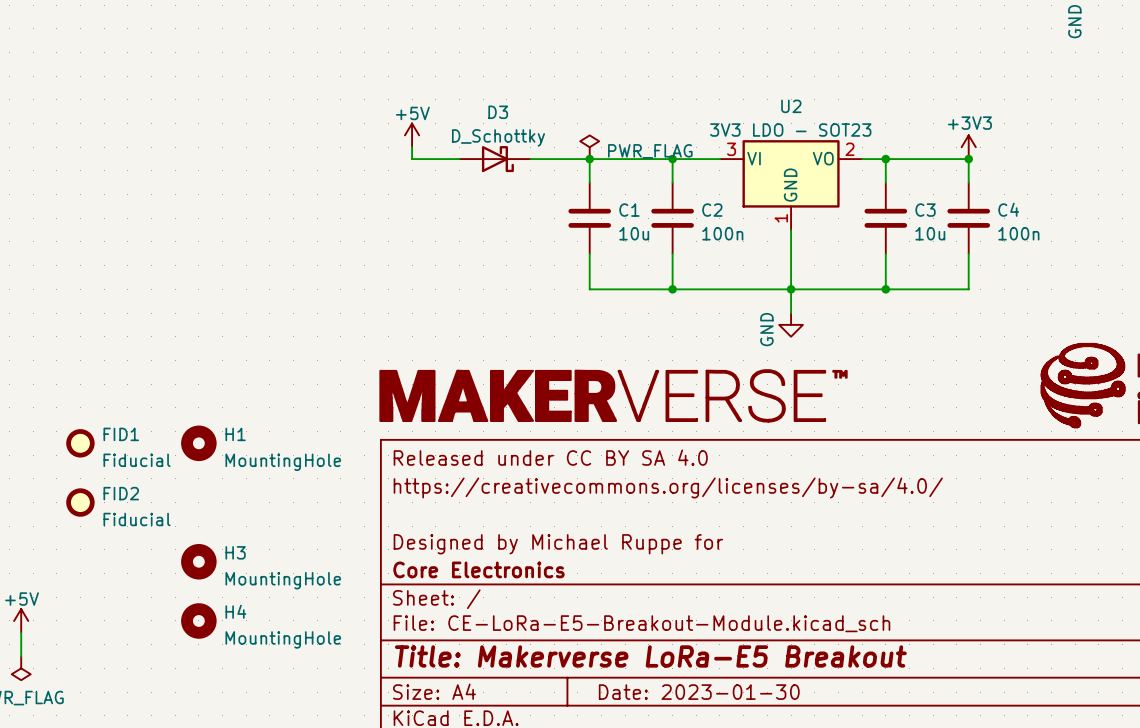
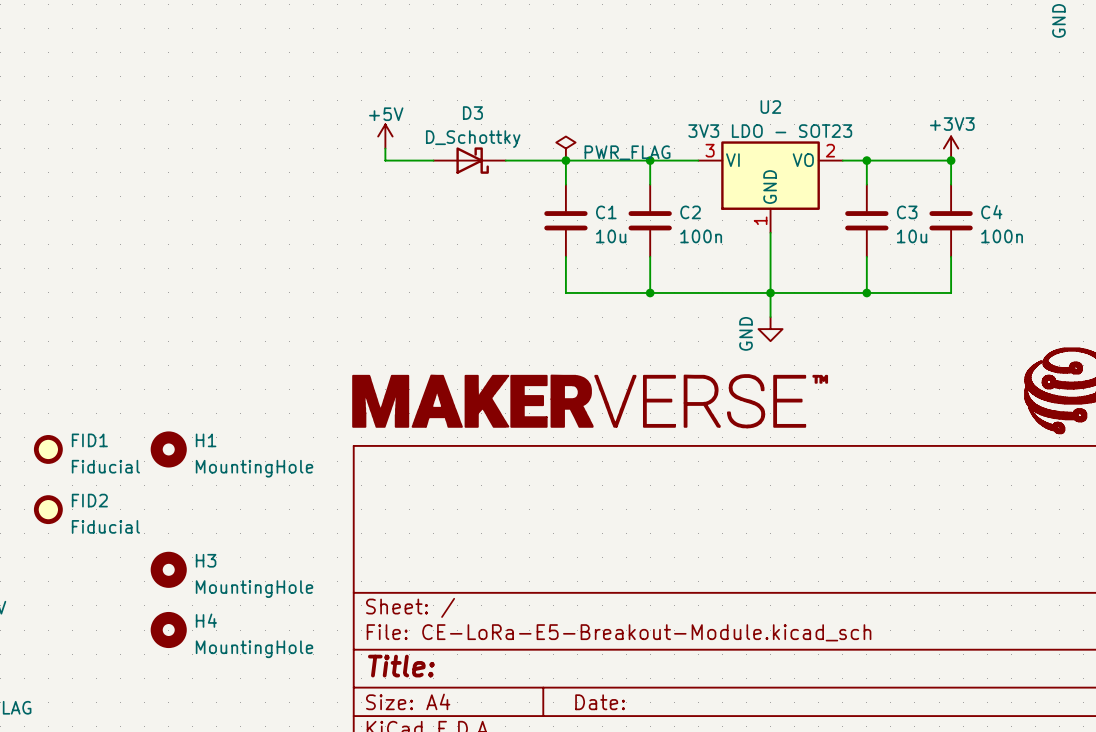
title block: Released under CC BY SA 4.0 (550, 457) -> none
title block: https://creativecommons.org/licenses/by-sa/4.0/ (668, 487) -> none
title block: Designed by Michael Ruppe for (558, 544) -> none
title block: Core Electronics (479, 569) -> none
title block: Title: Makerverse LoRa-E5 Breakout (650, 656) -> Title: (401, 666)
title block: Date: 2023-01-30 (699, 692) -> Date: (600, 702)

